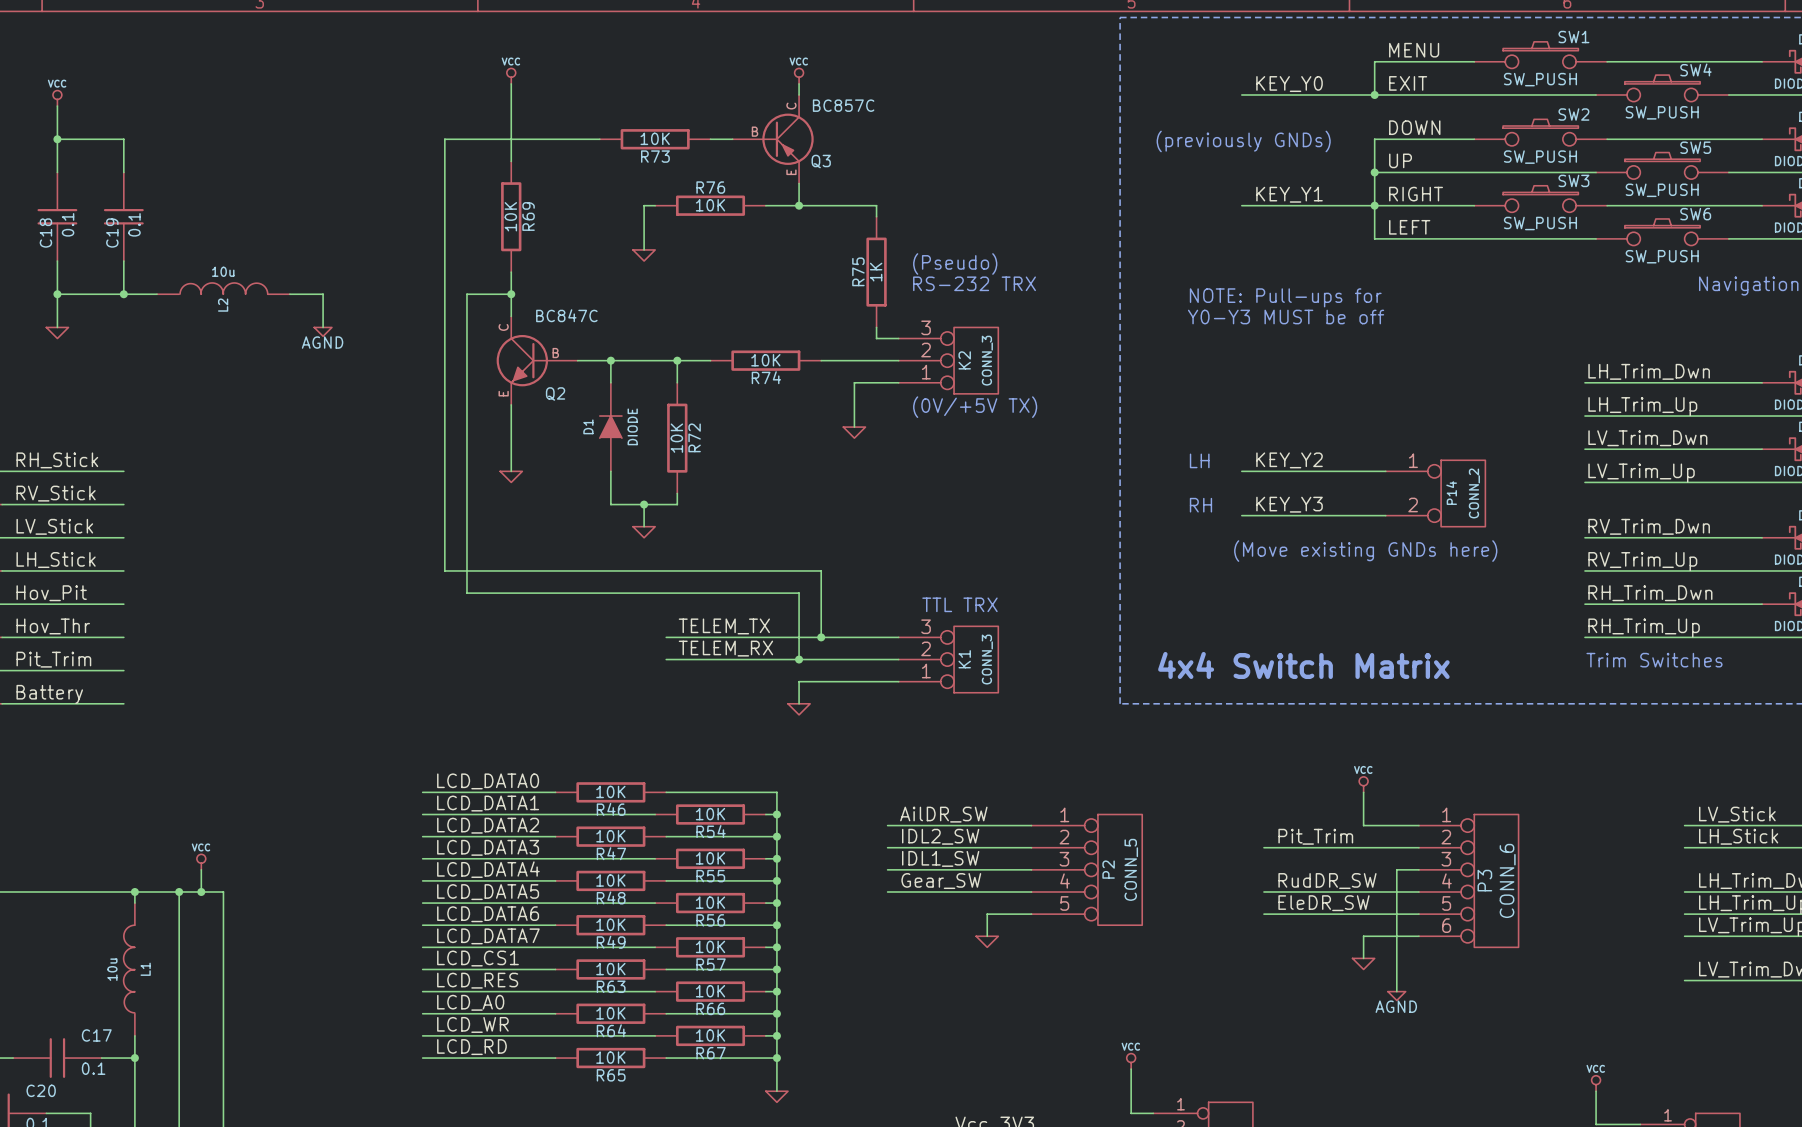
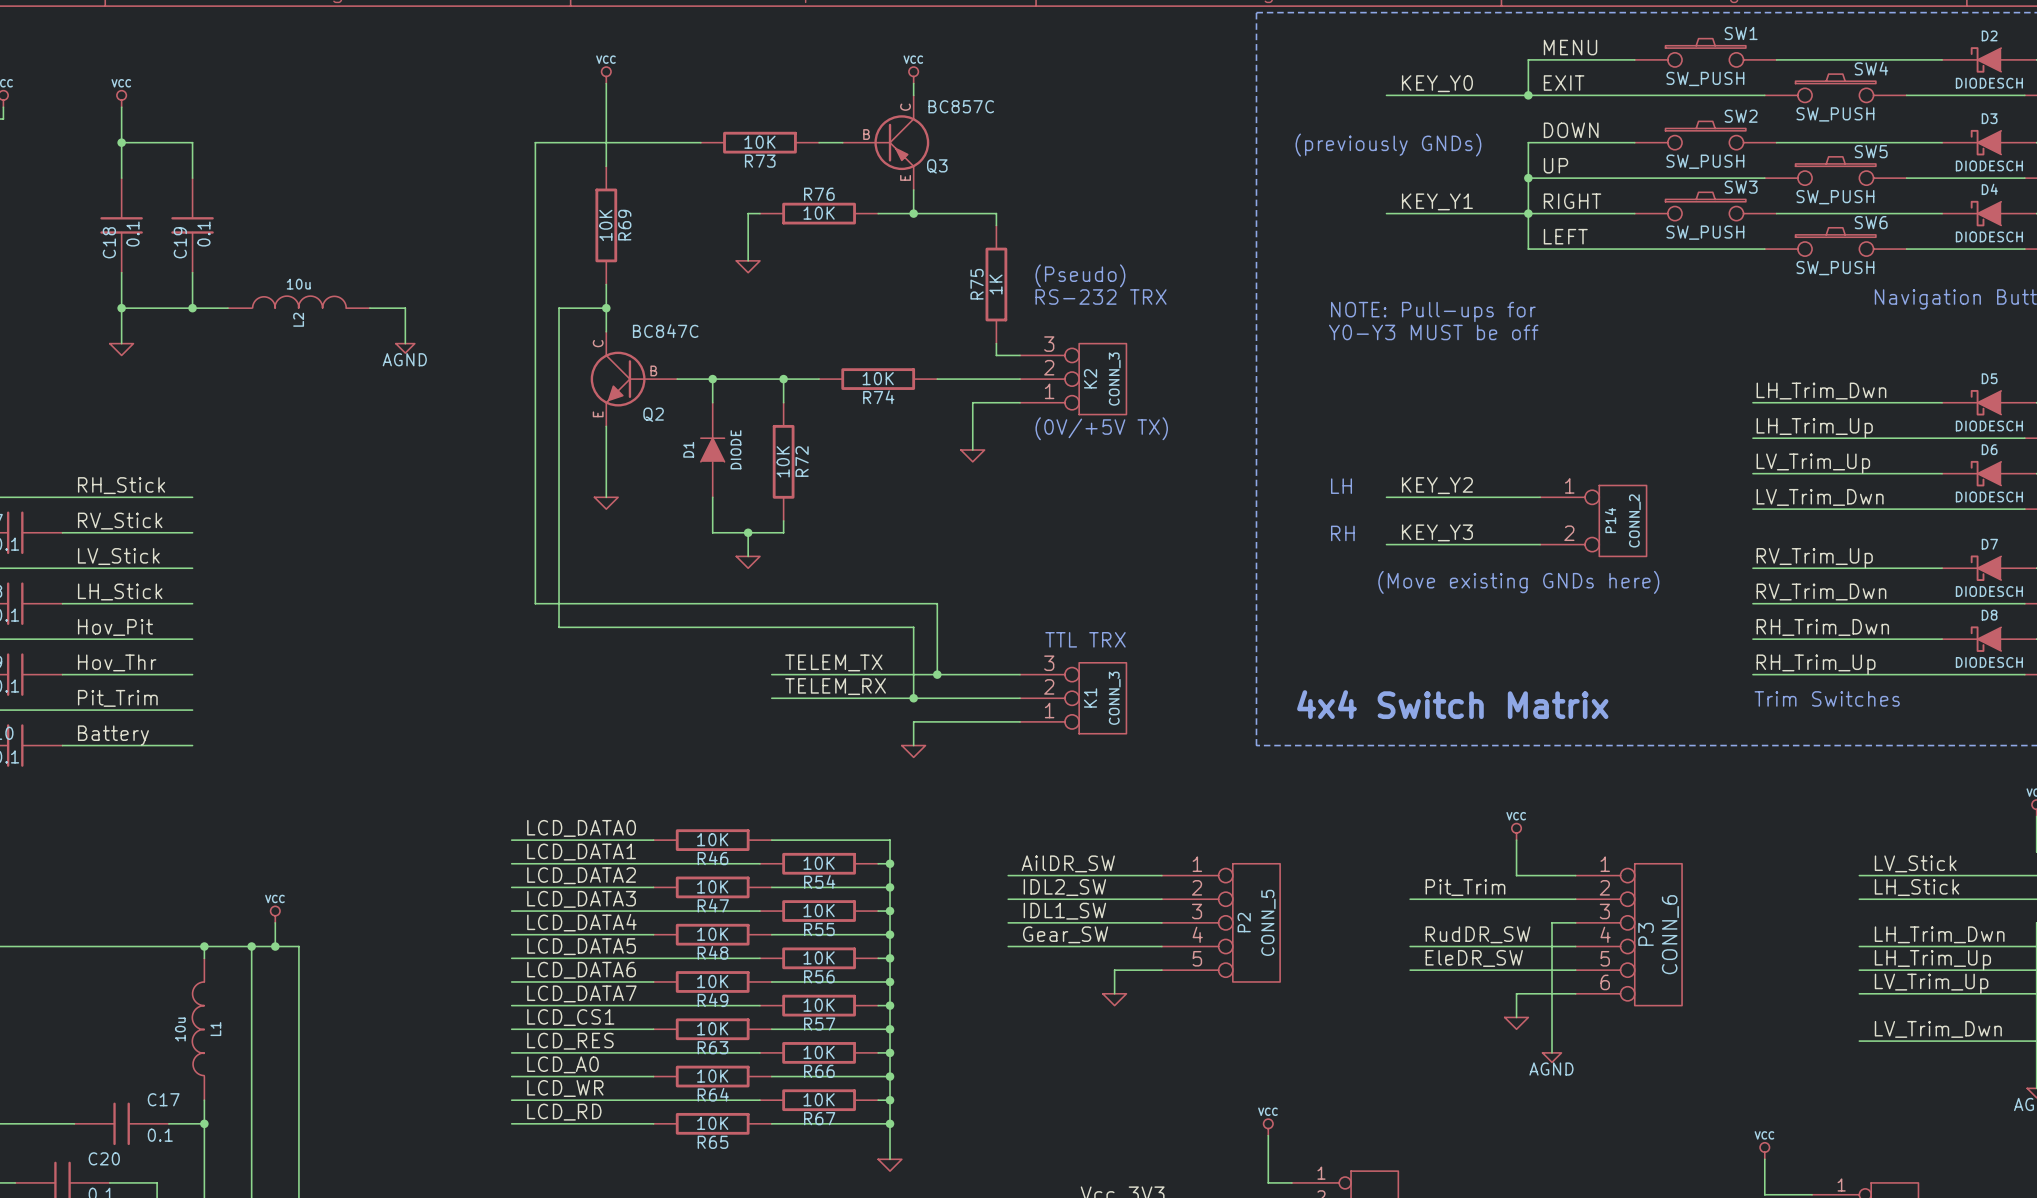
label: LV_Trim_Dwn (1647, 438) -> LV_Trim_Up (1813, 463)
label: LV_Trim_Up (1641, 473) -> LV_Trim_Dwn (1820, 497)
label: RV_Trim_Dwn (1649, 526) -> RV_Trim_Up (1814, 558)
label: RV_Trim_Up (1642, 561) -> RV_Trim_Dwn (1821, 592)

